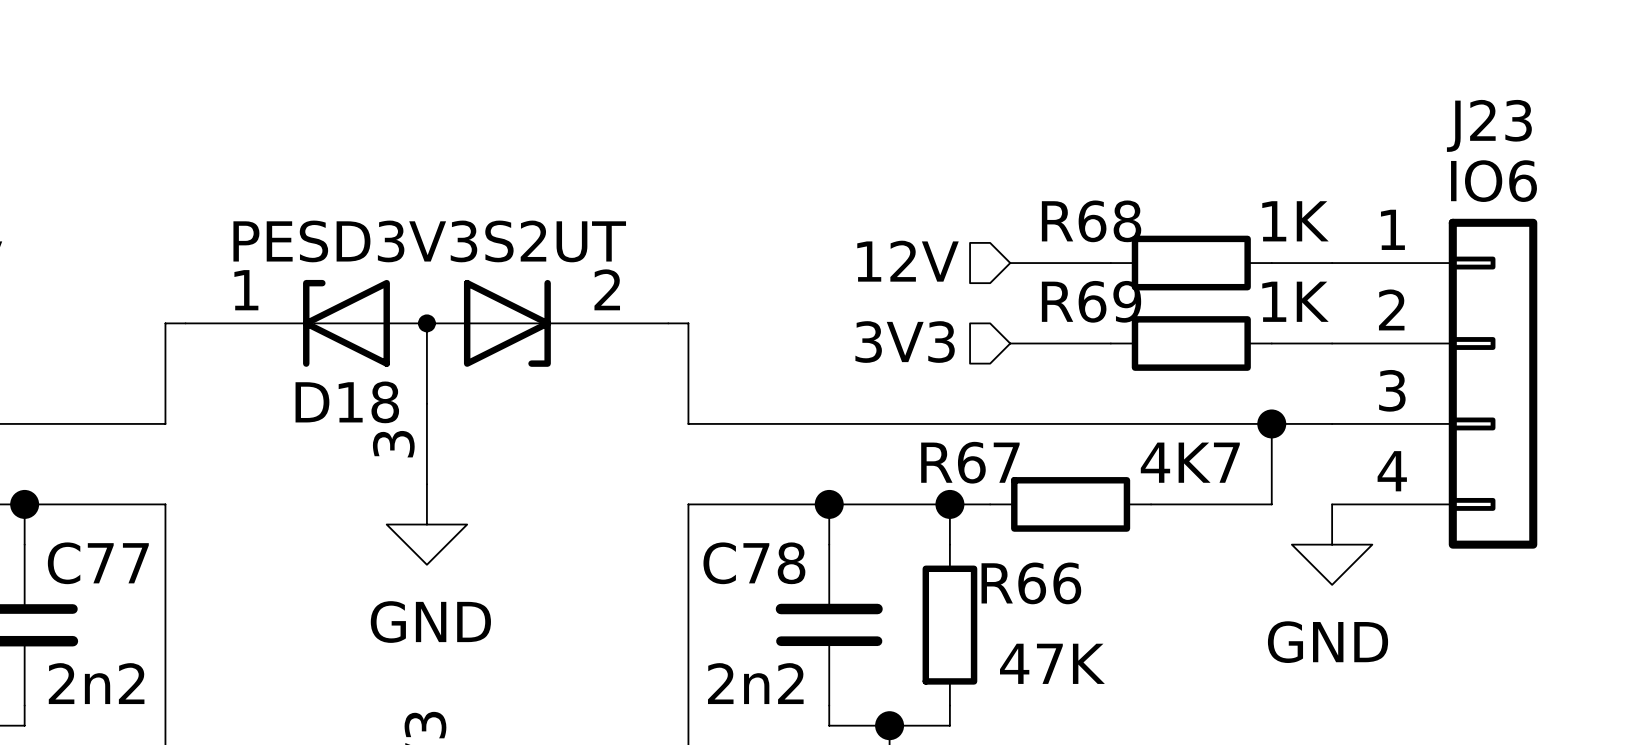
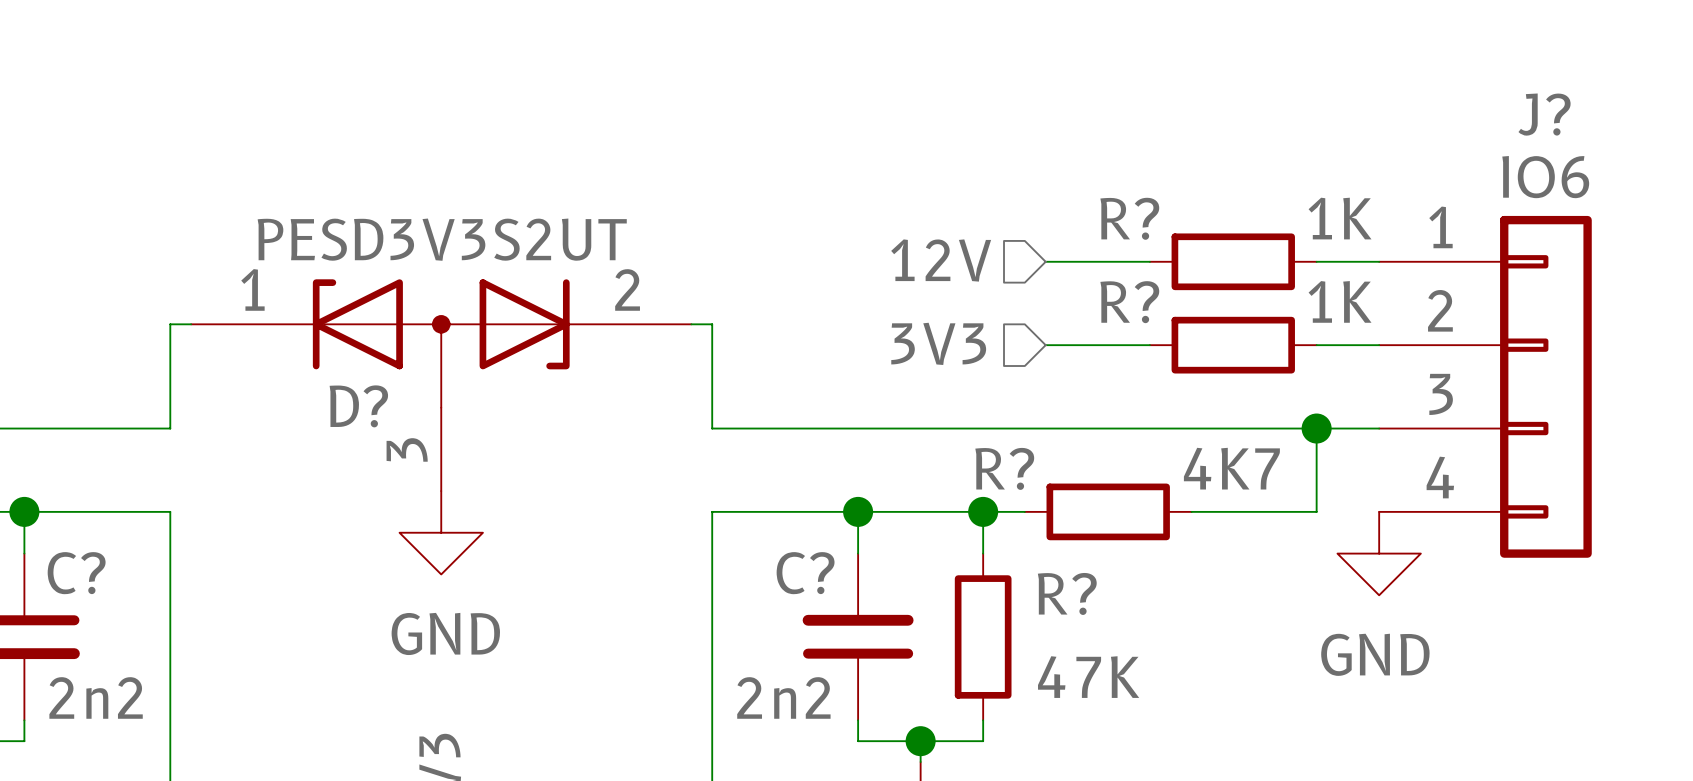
J23 name: J23 (1489, 125) -> J? (1544, 114)
R68 name: R68 (1091, 221) -> R? (1129, 218)
R69 name: R69 (1091, 301) -> R? (1129, 302)
D18 name: D18 (347, 402) -> D? (358, 406)
R67 name: R67 (970, 462) -> R? (1004, 468)
C77 name: C77 (98, 563) -> C? (76, 573)
C78 name: C78 (754, 563) -> C? (805, 573)
R66 name: R66 (1031, 583) -> R? (1067, 593)

